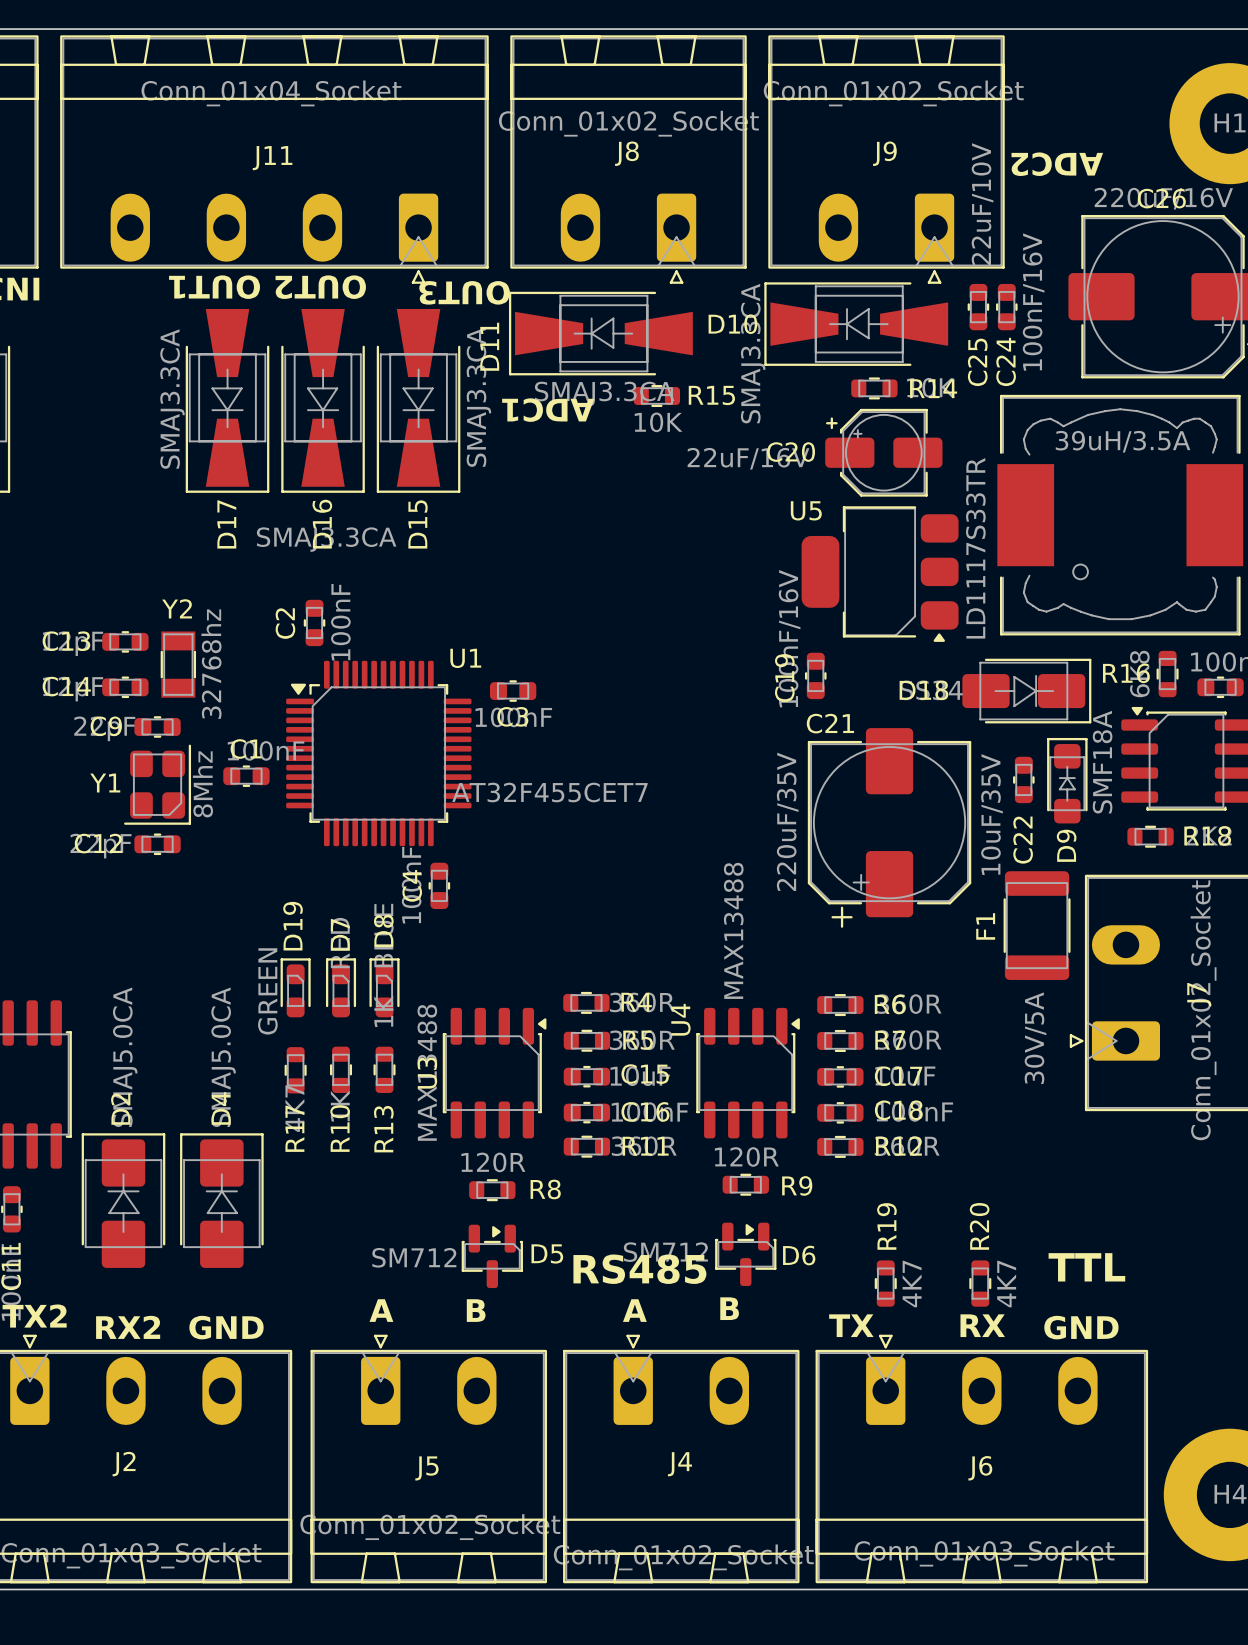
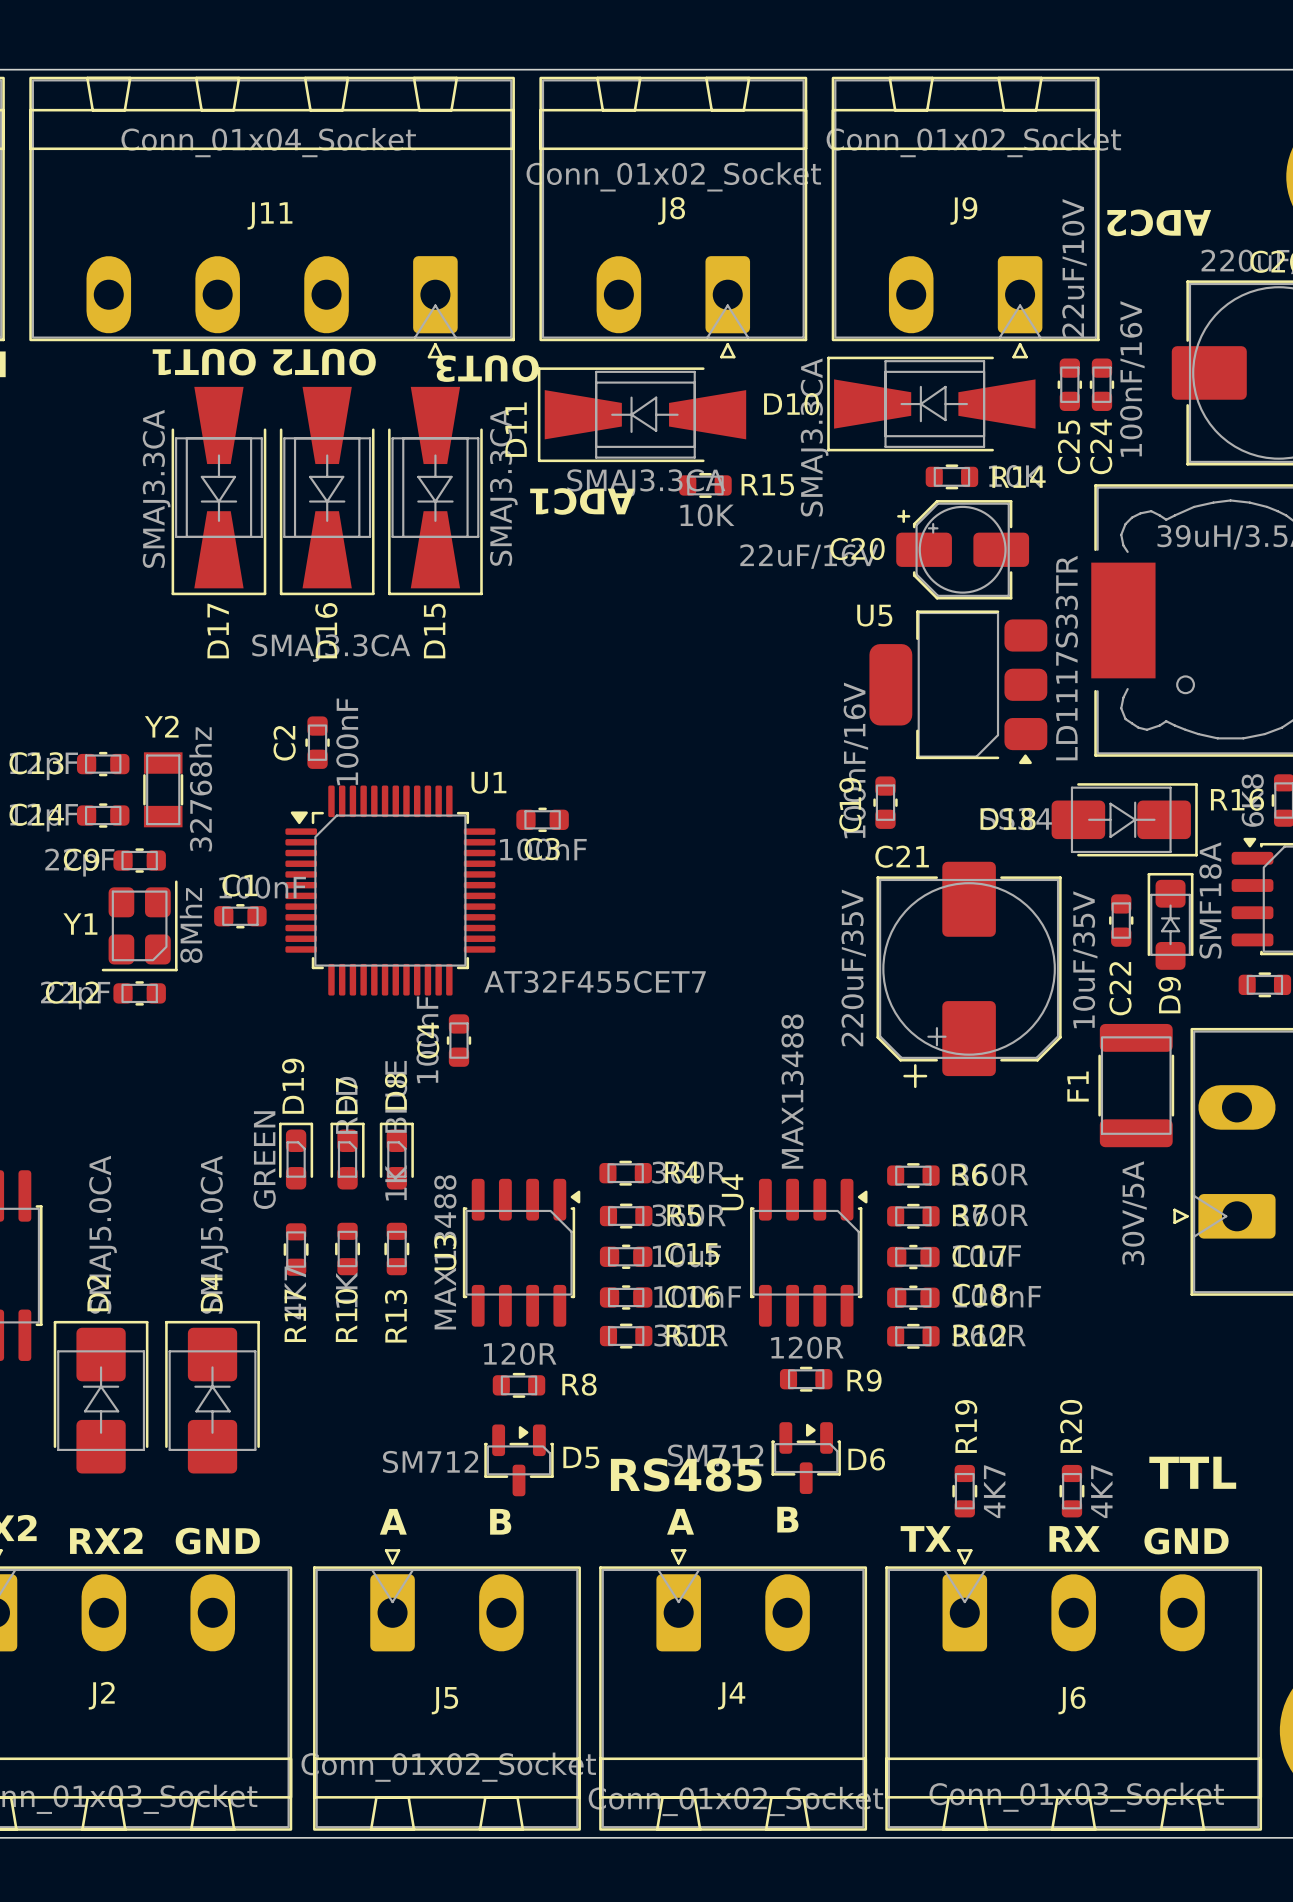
U1 value position: AT32F455CET7 (549, 792) -> AT32F455CET7 (595, 981)

